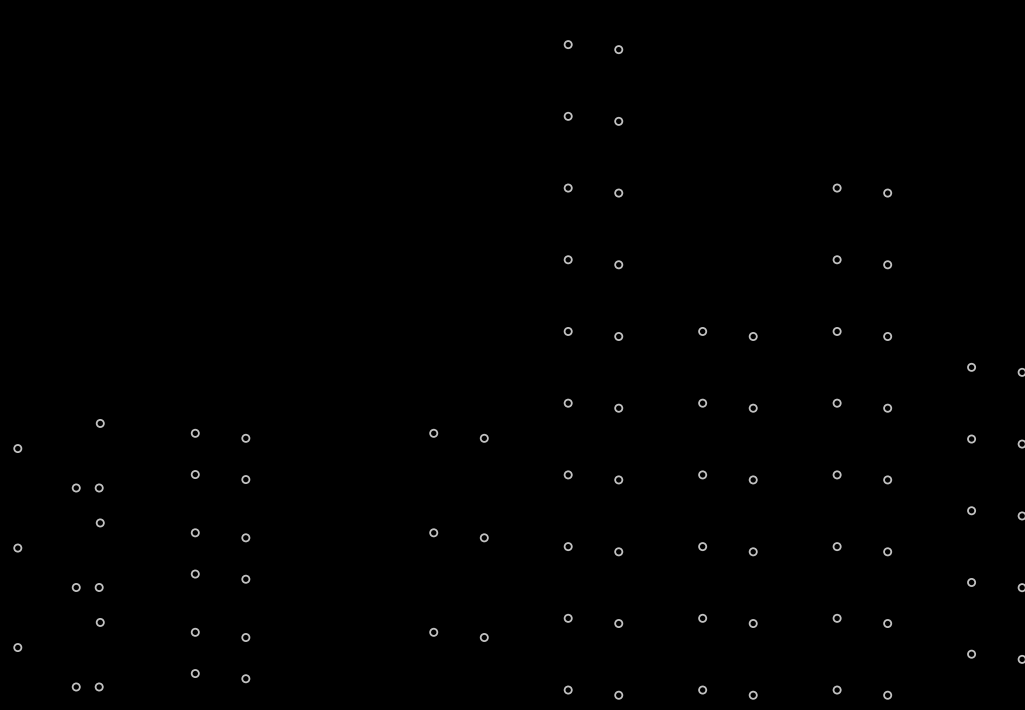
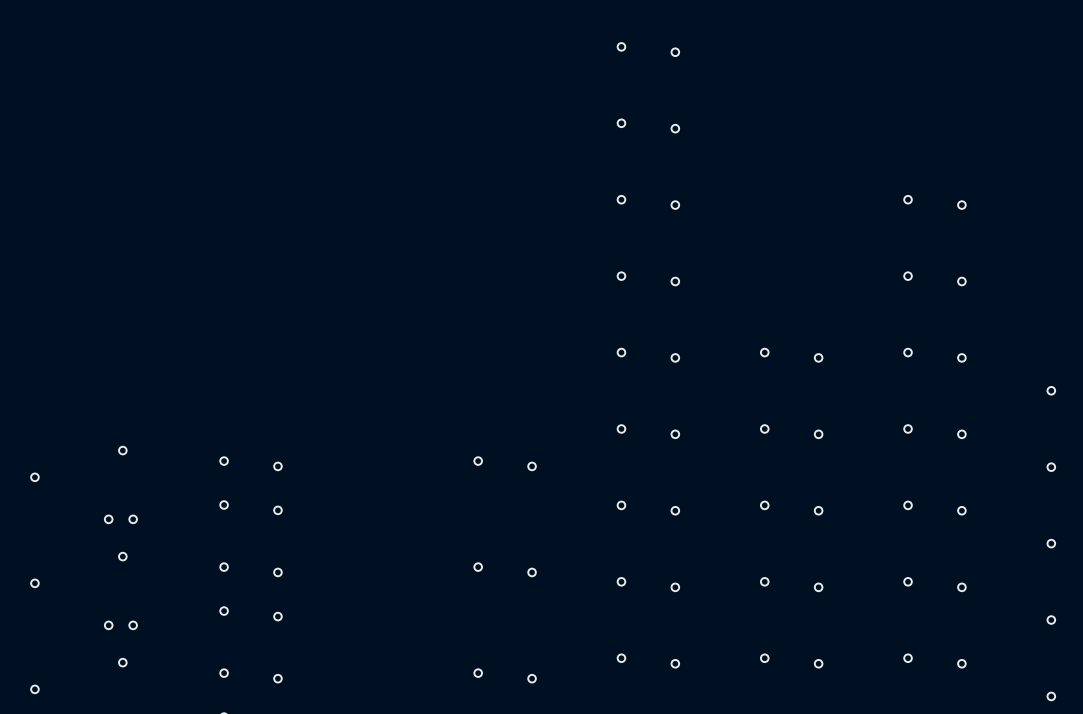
via: (76, 487) -> none
via: none -> (108, 519)
via: (99, 487) -> none
via: none -> (133, 519)
via: (76, 587) -> none
via: none -> (108, 625)
via: (99, 587) -> none
via: none -> (133, 625)

